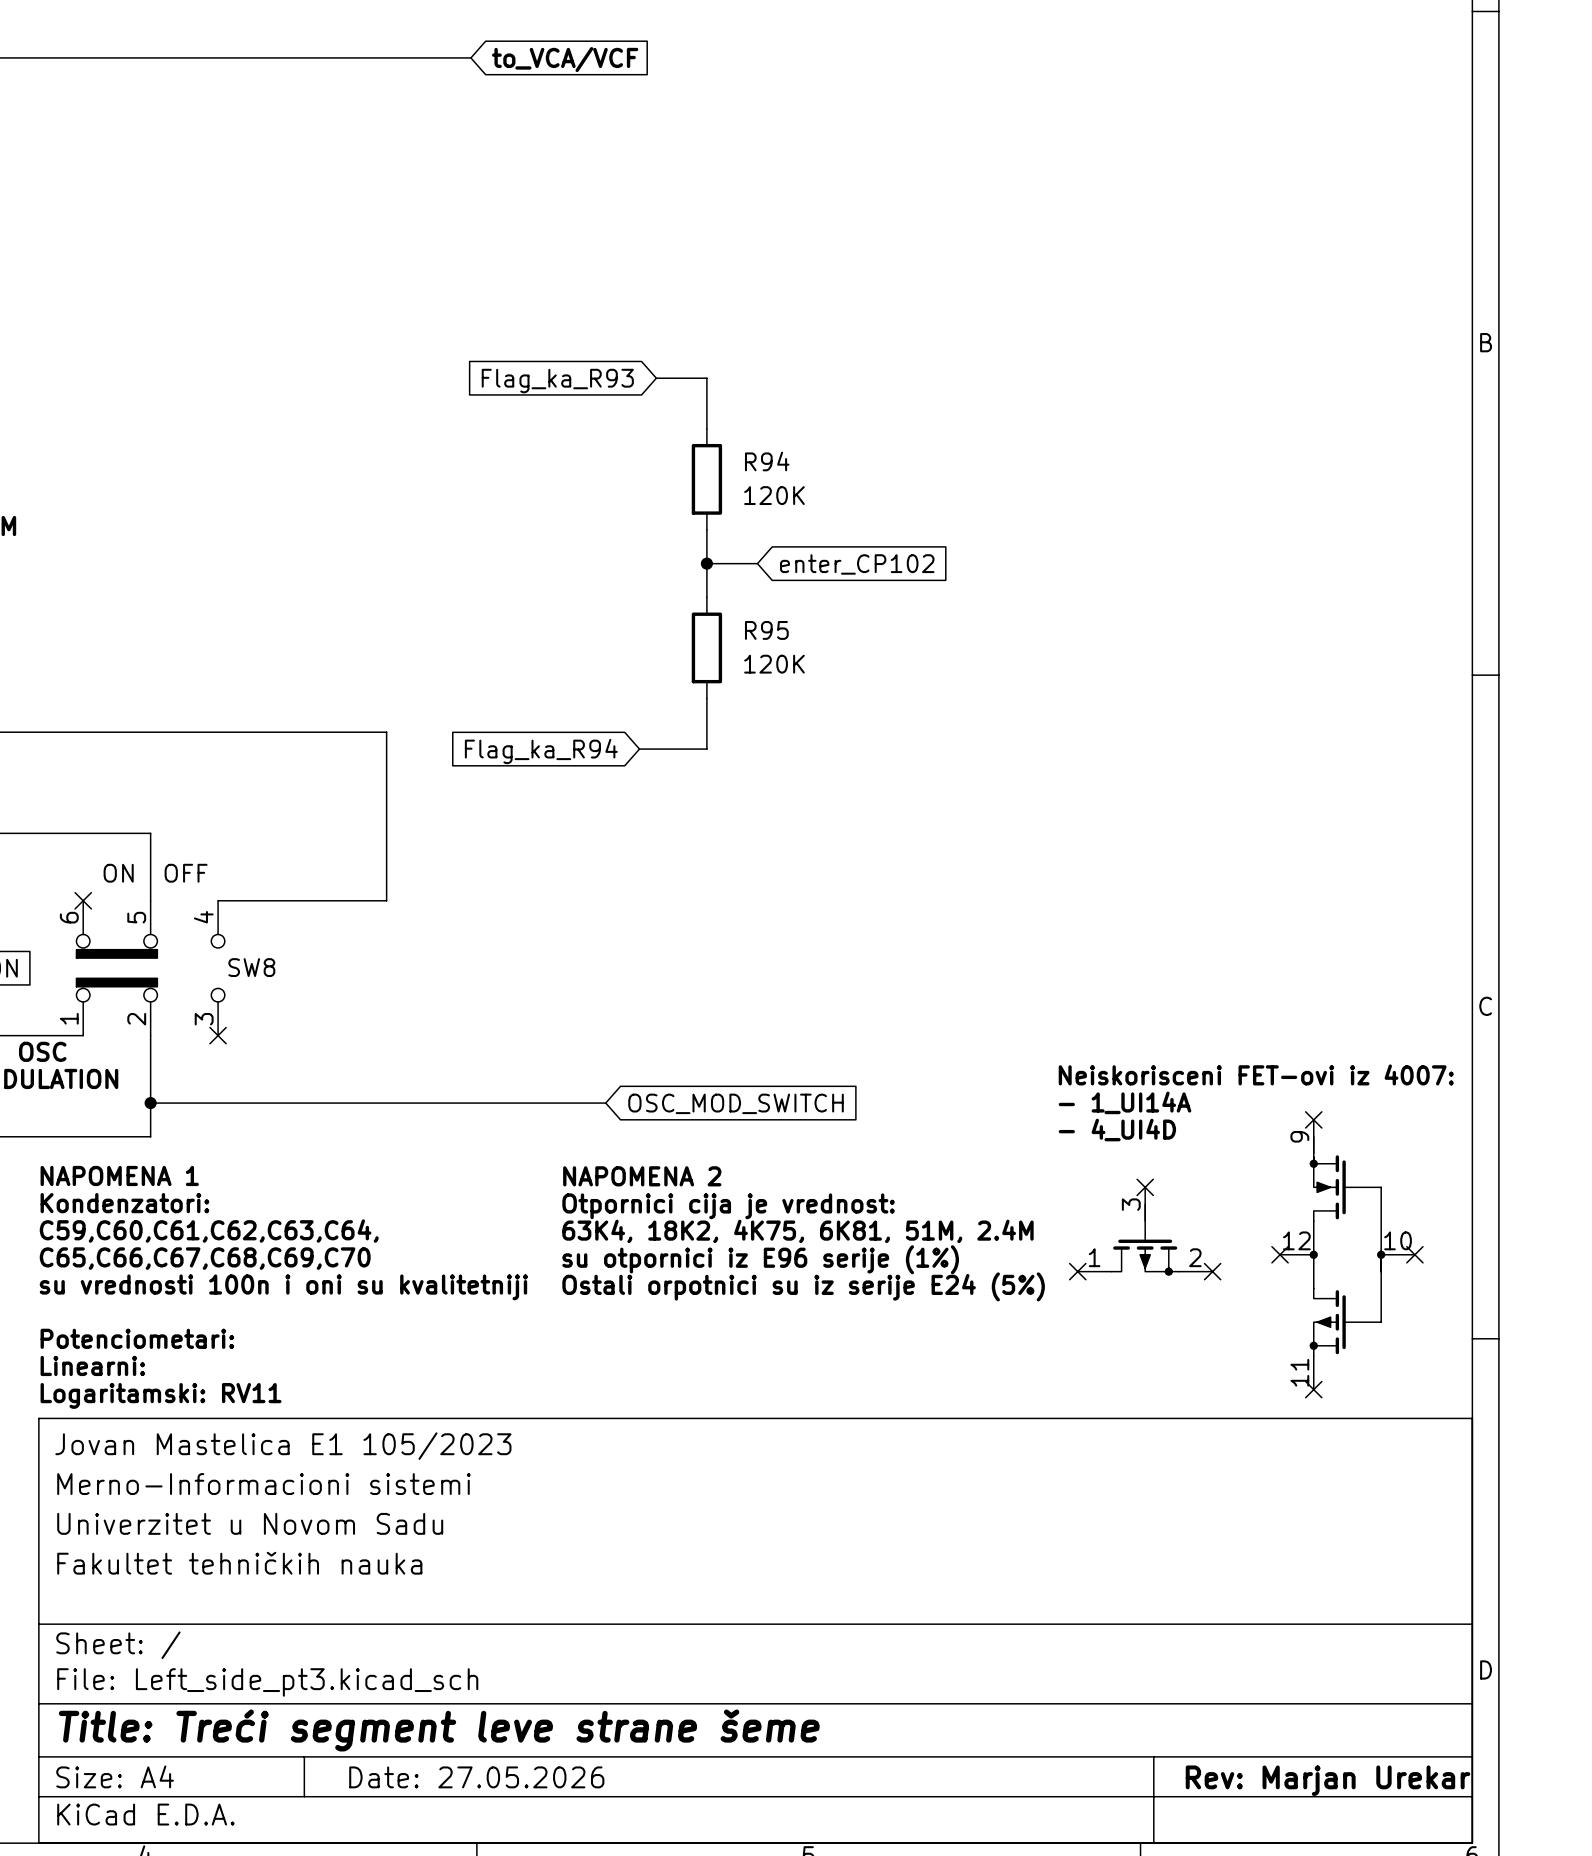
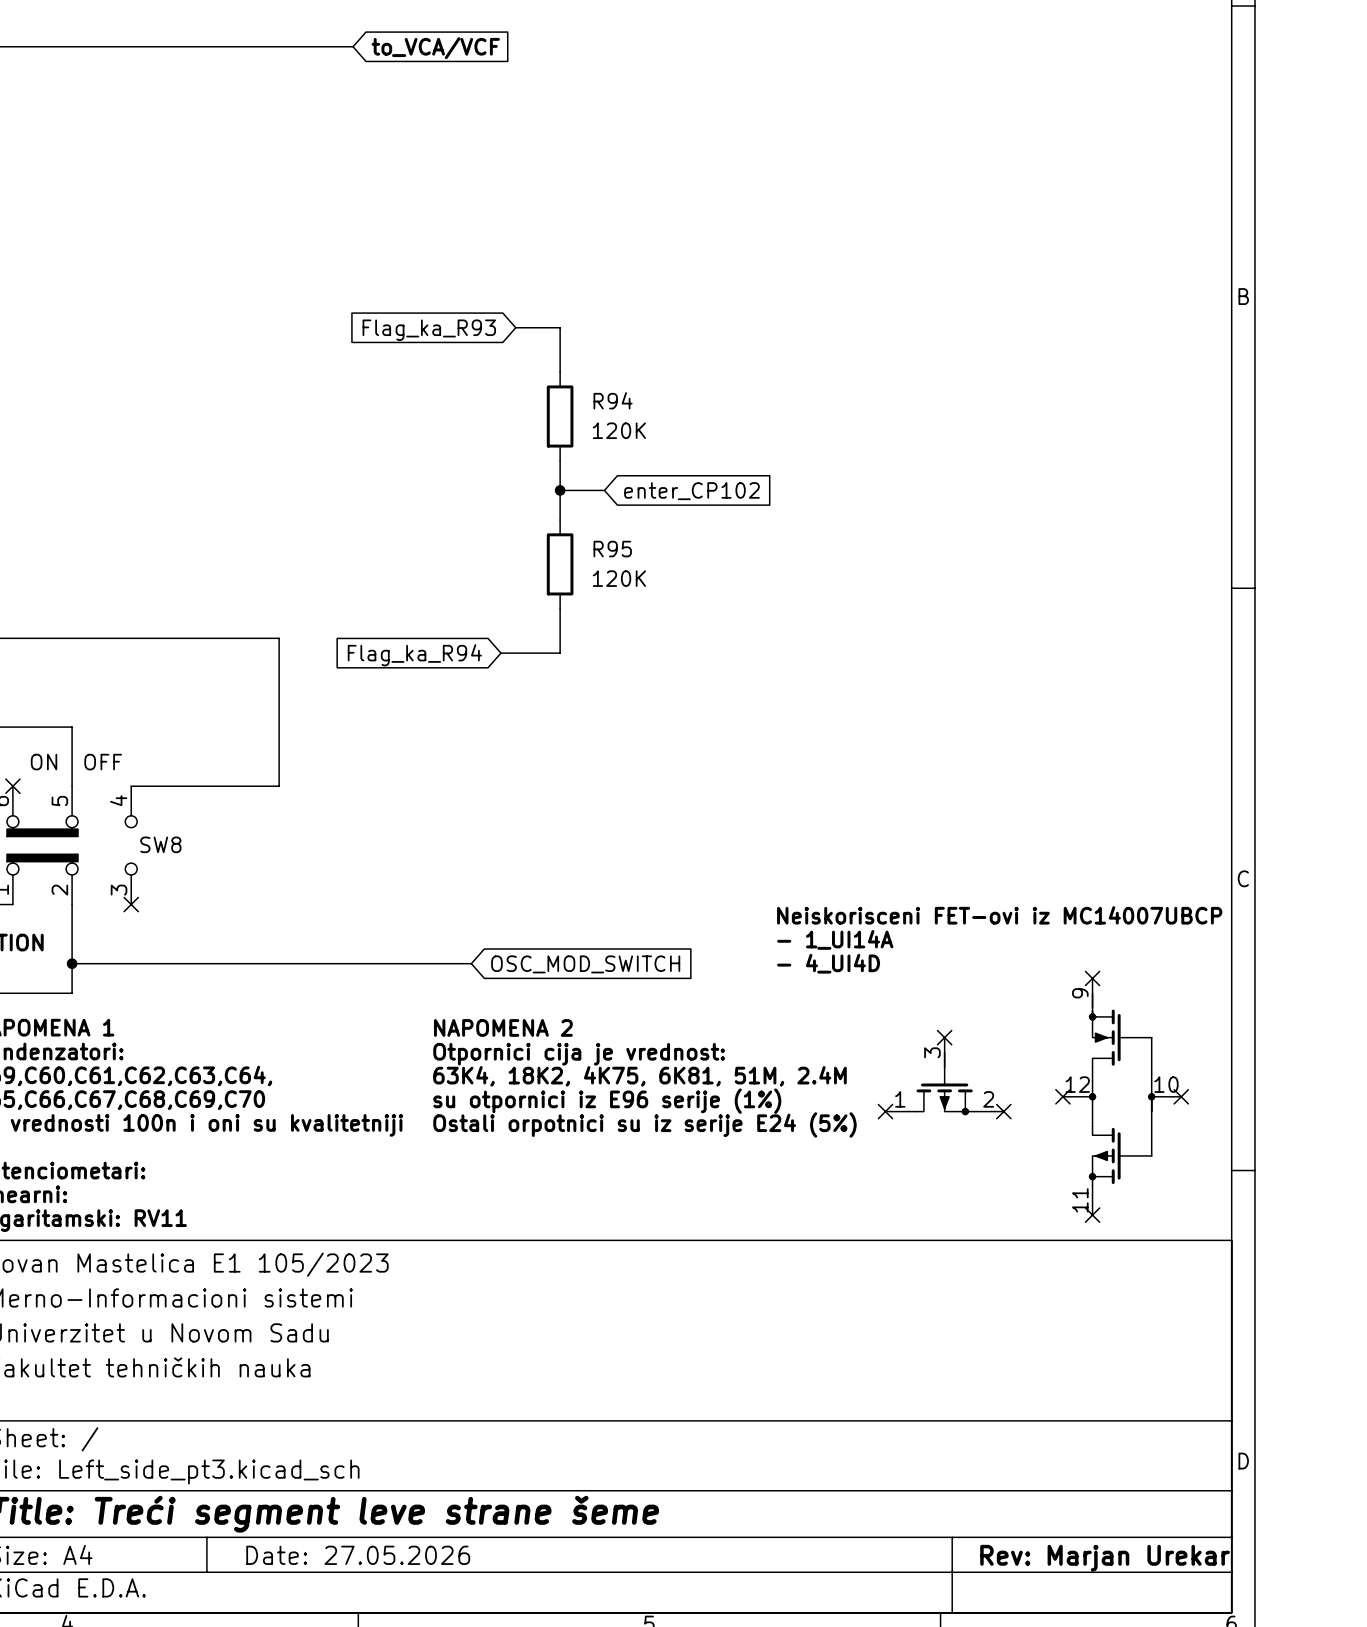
text: Neiskorisceni FET-ovi iz 4007: (1256, 1074) -> Neiskorisceni FET-ovi iz MC14007UBCP (999, 915)
text position: - 1_UI14A (1125, 1102) -> - 1_UI14A (835, 939)
text position: - 4_UI4D (1117, 1130) -> - 4_UI4D (828, 963)

